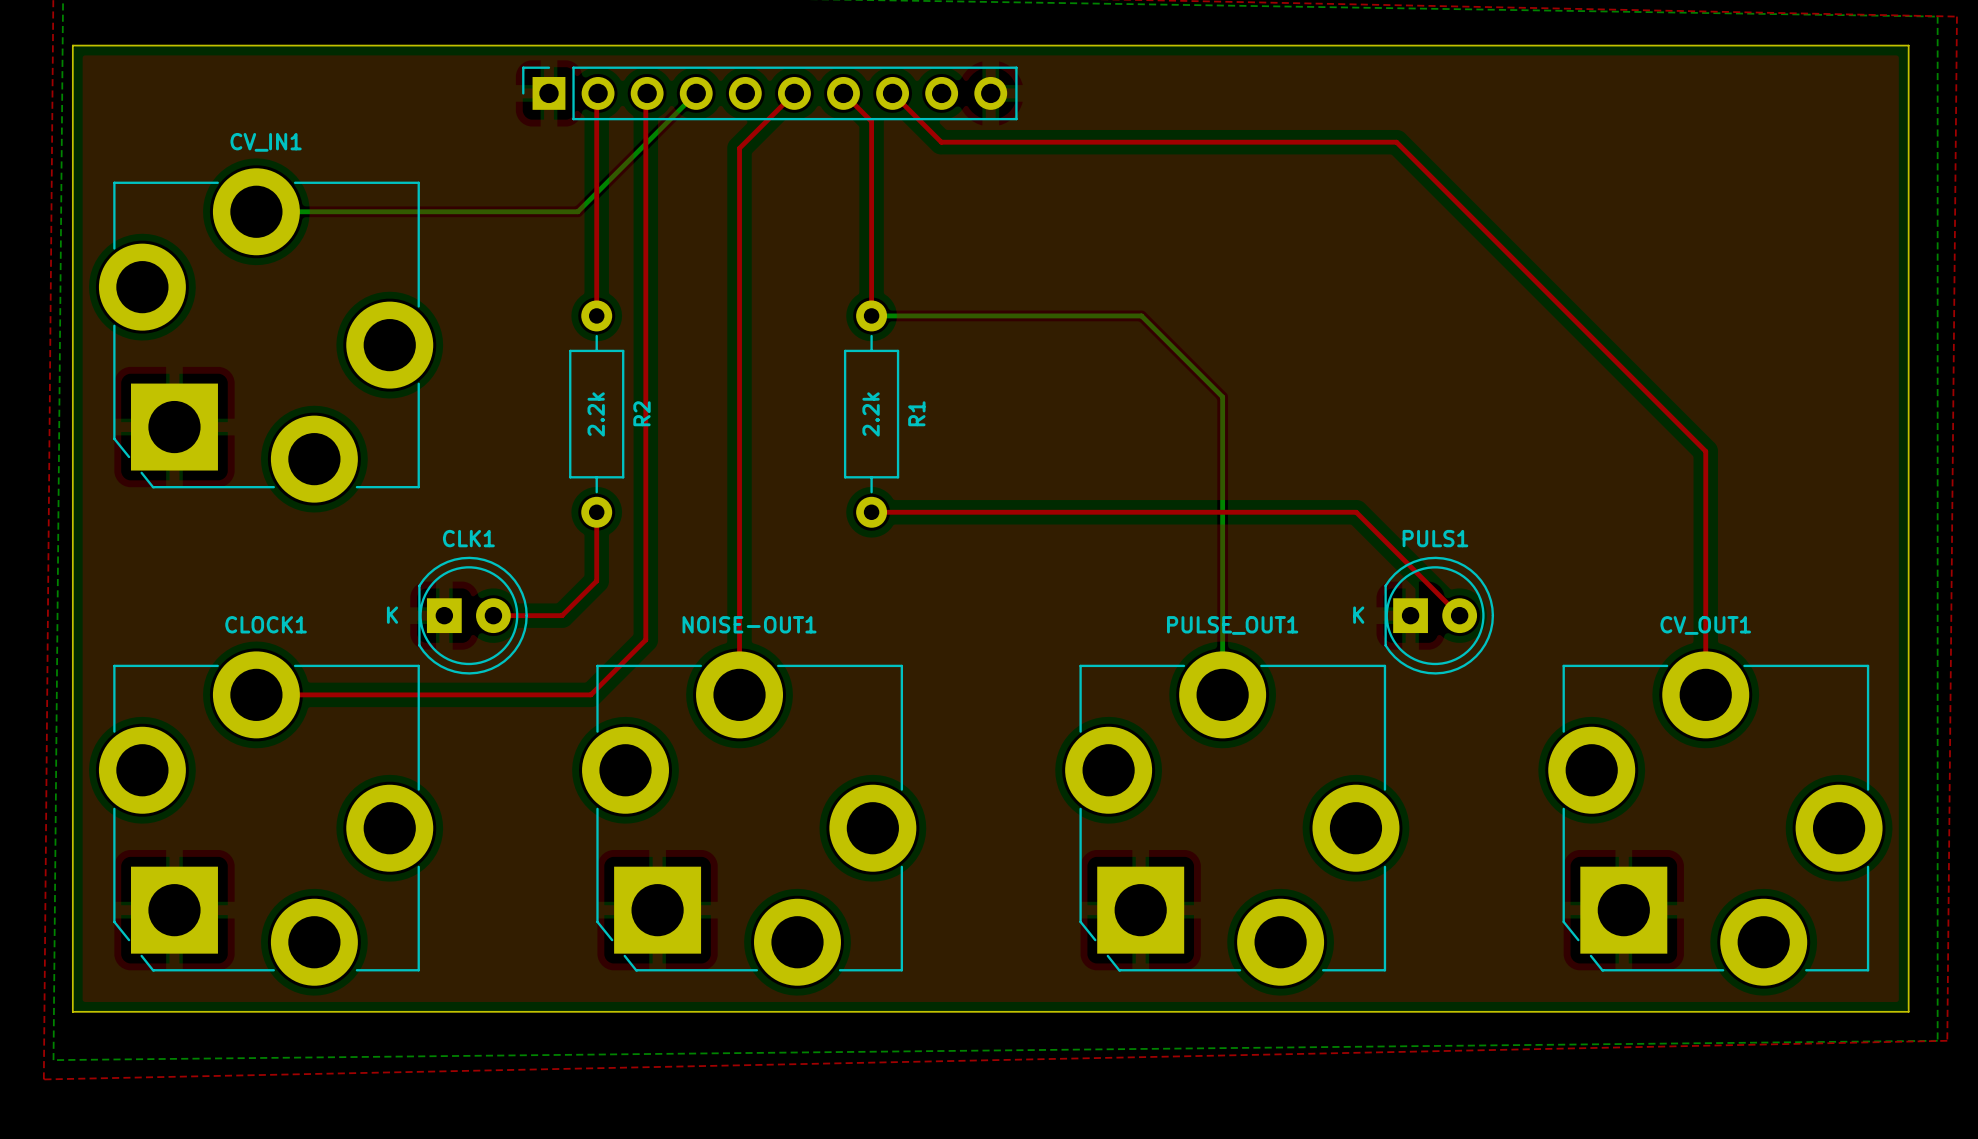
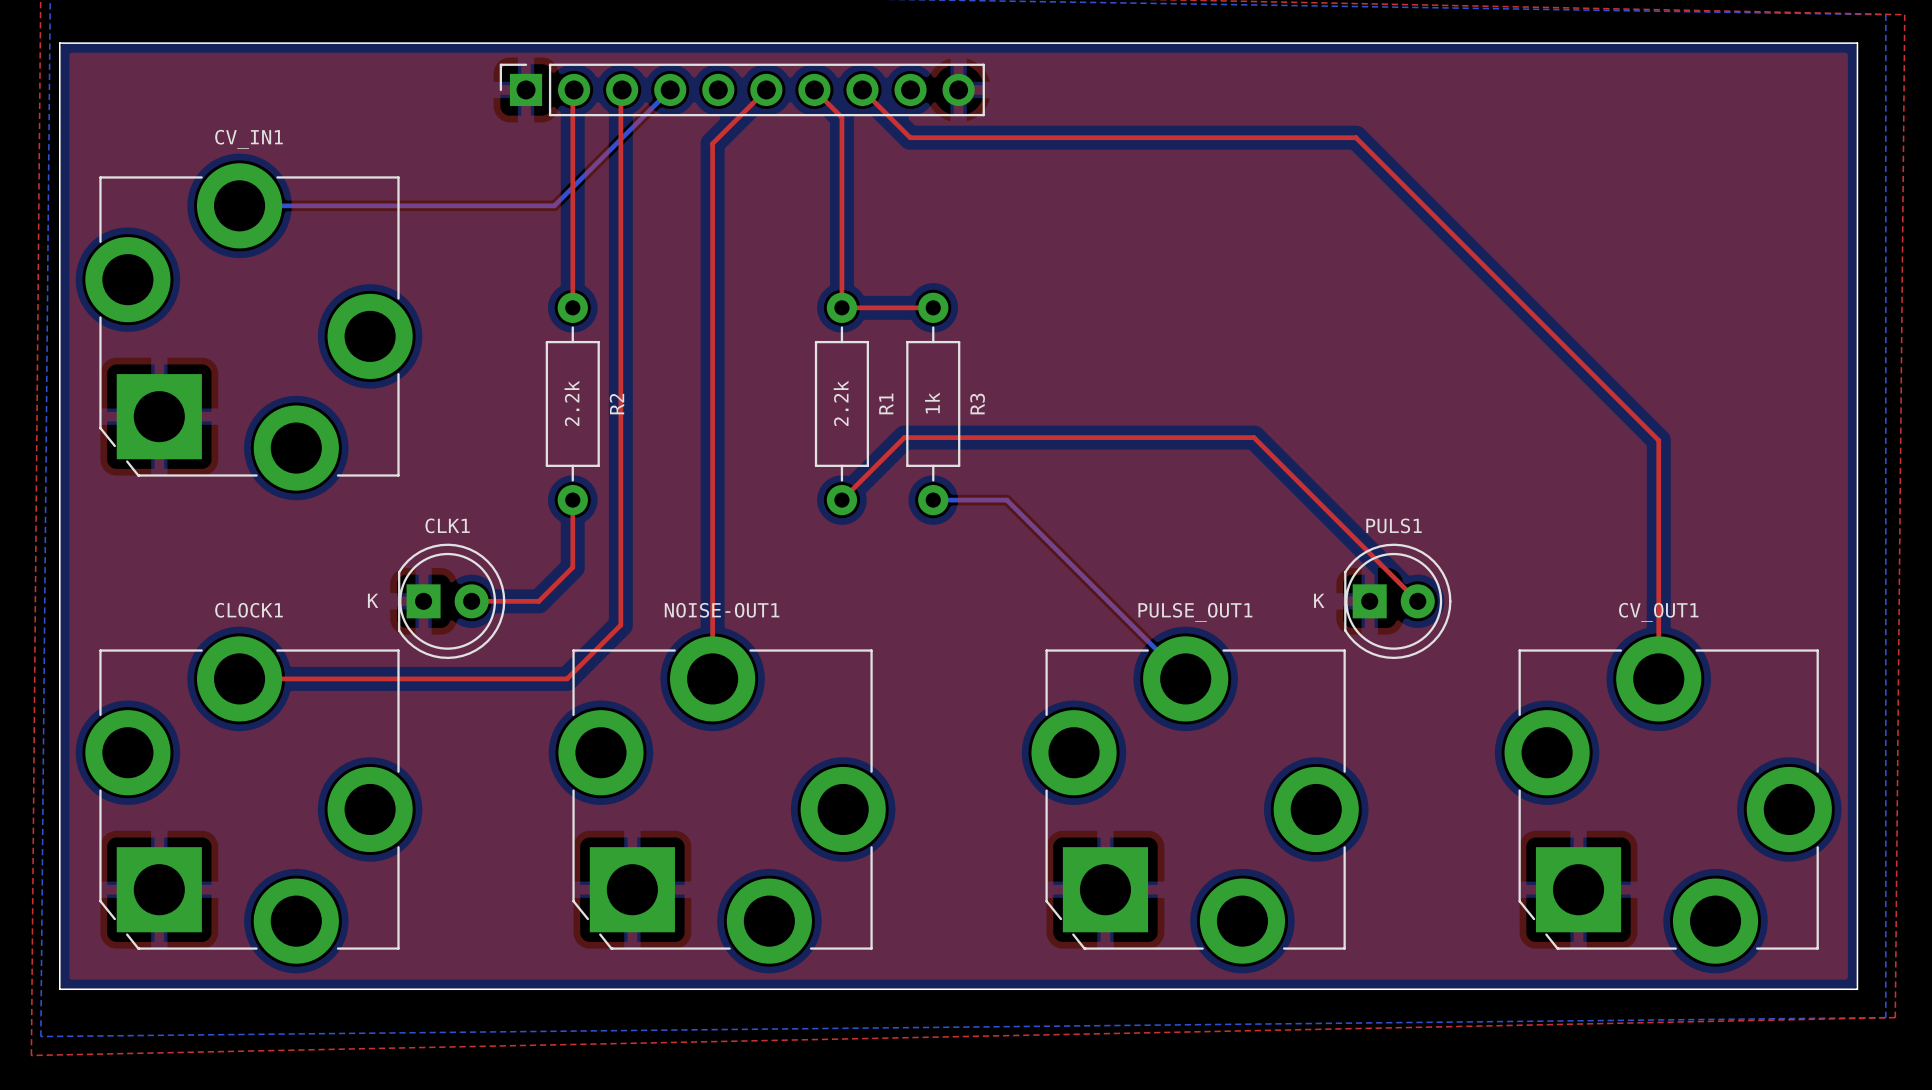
top track: none -> (841, 307) (933, 307)
bottom track: (871, 315) (1141, 315) (1222, 397) (1222, 694) -> (933, 500) (1006, 500) (1185, 678)
R3: none -> 1k (933, 403)
top track: (871, 512) (1356, 512) -> (841, 500) (904, 437) (1254, 437) (1316, 500)

